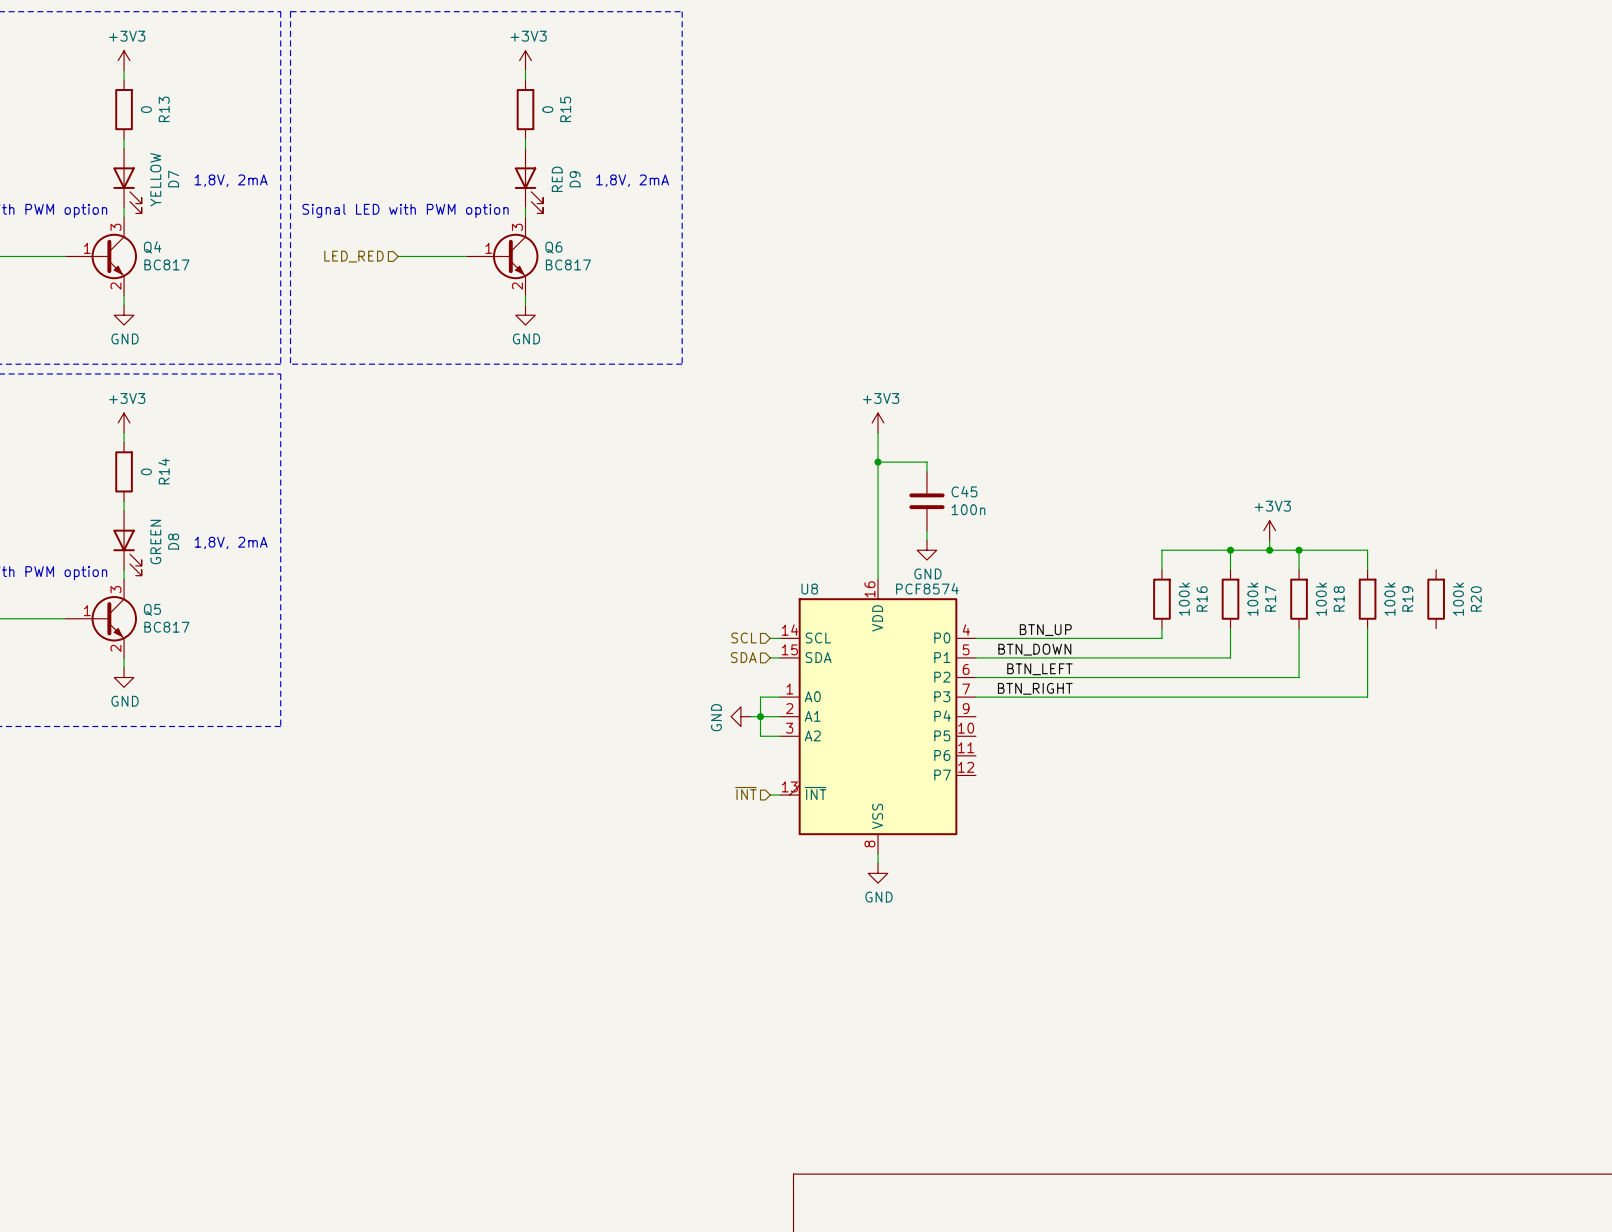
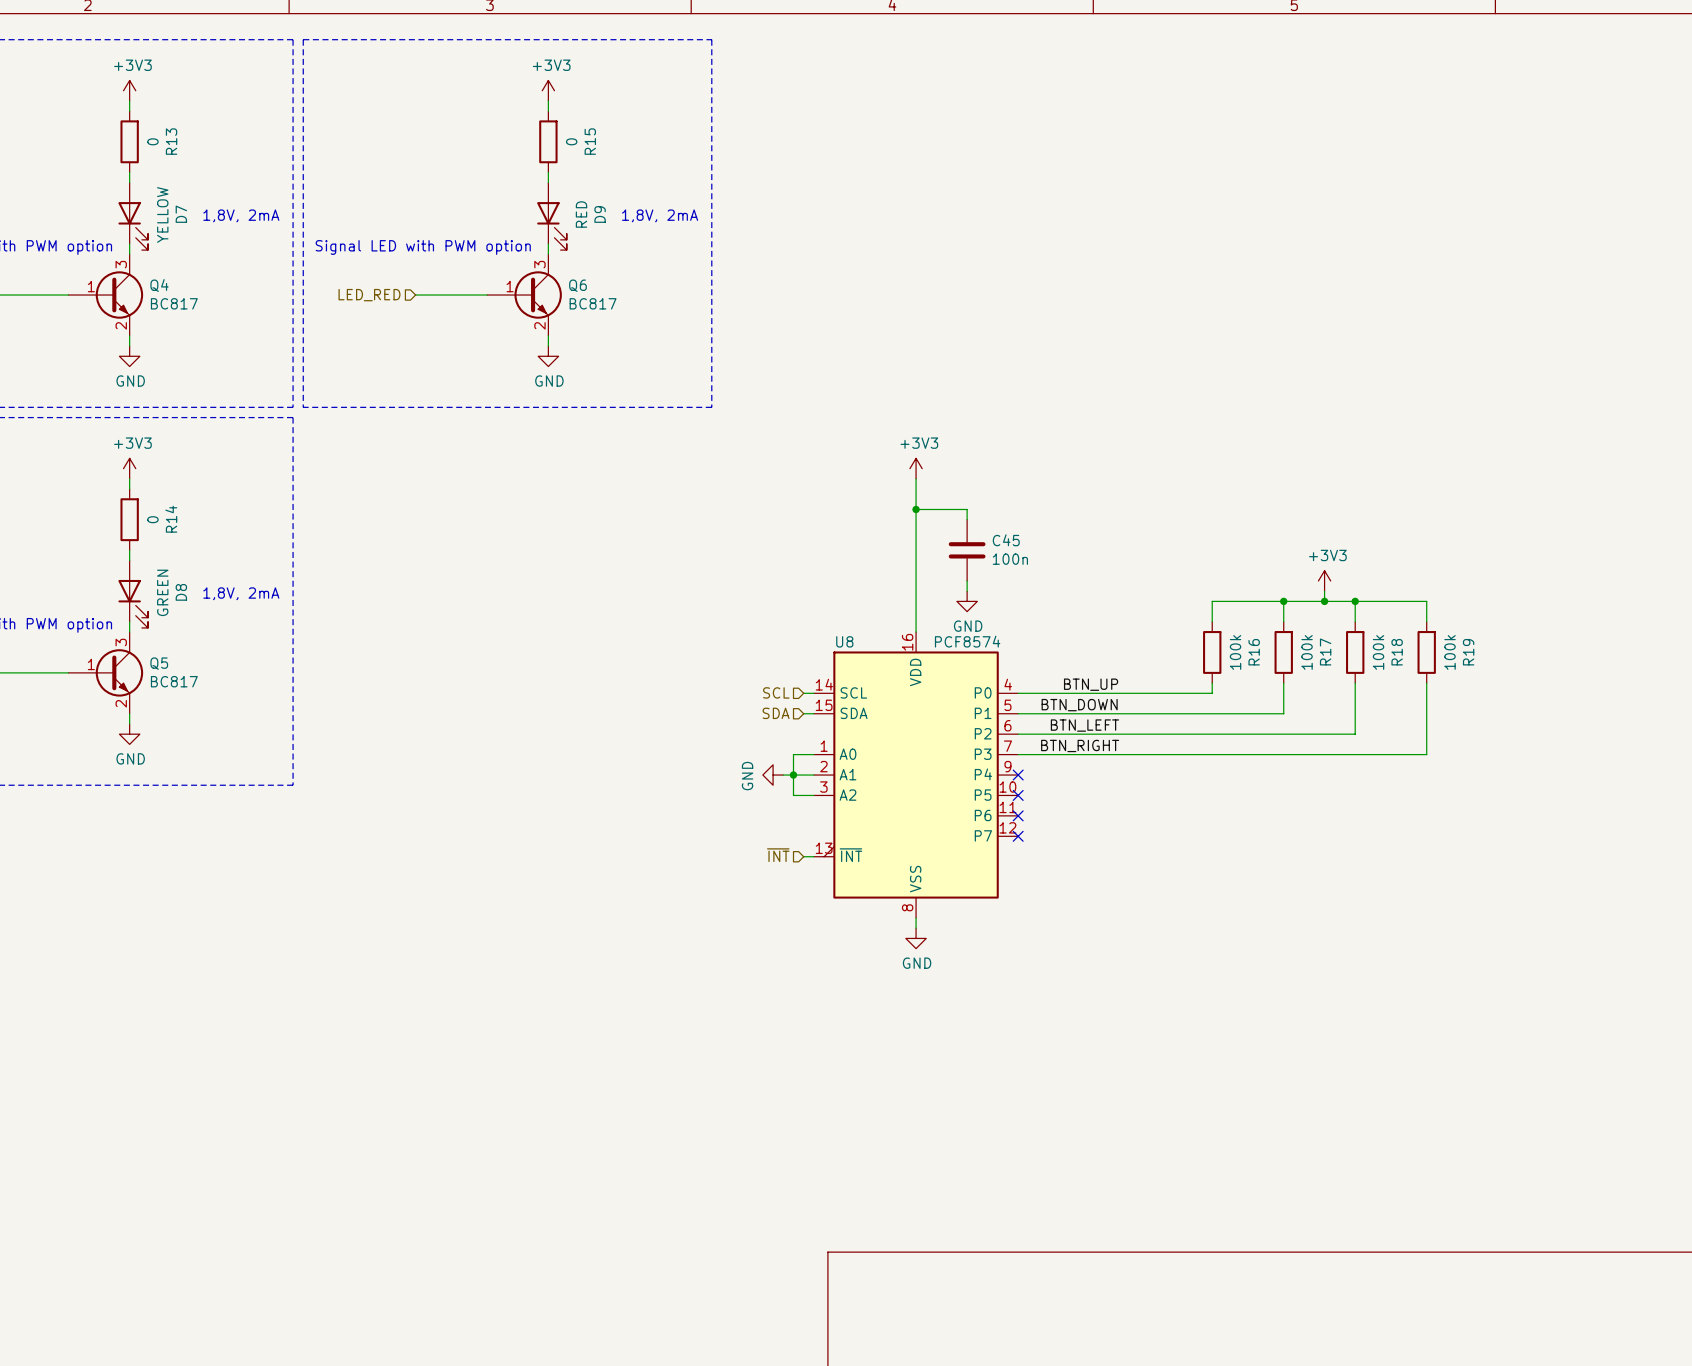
R20: 100k (1436, 599) -> none
no-connect mark: none -> (1018, 775)
no-connect mark: none -> (1018, 795)
no-connect mark: none -> (1018, 815)
no-connect mark: none -> (1018, 836)

